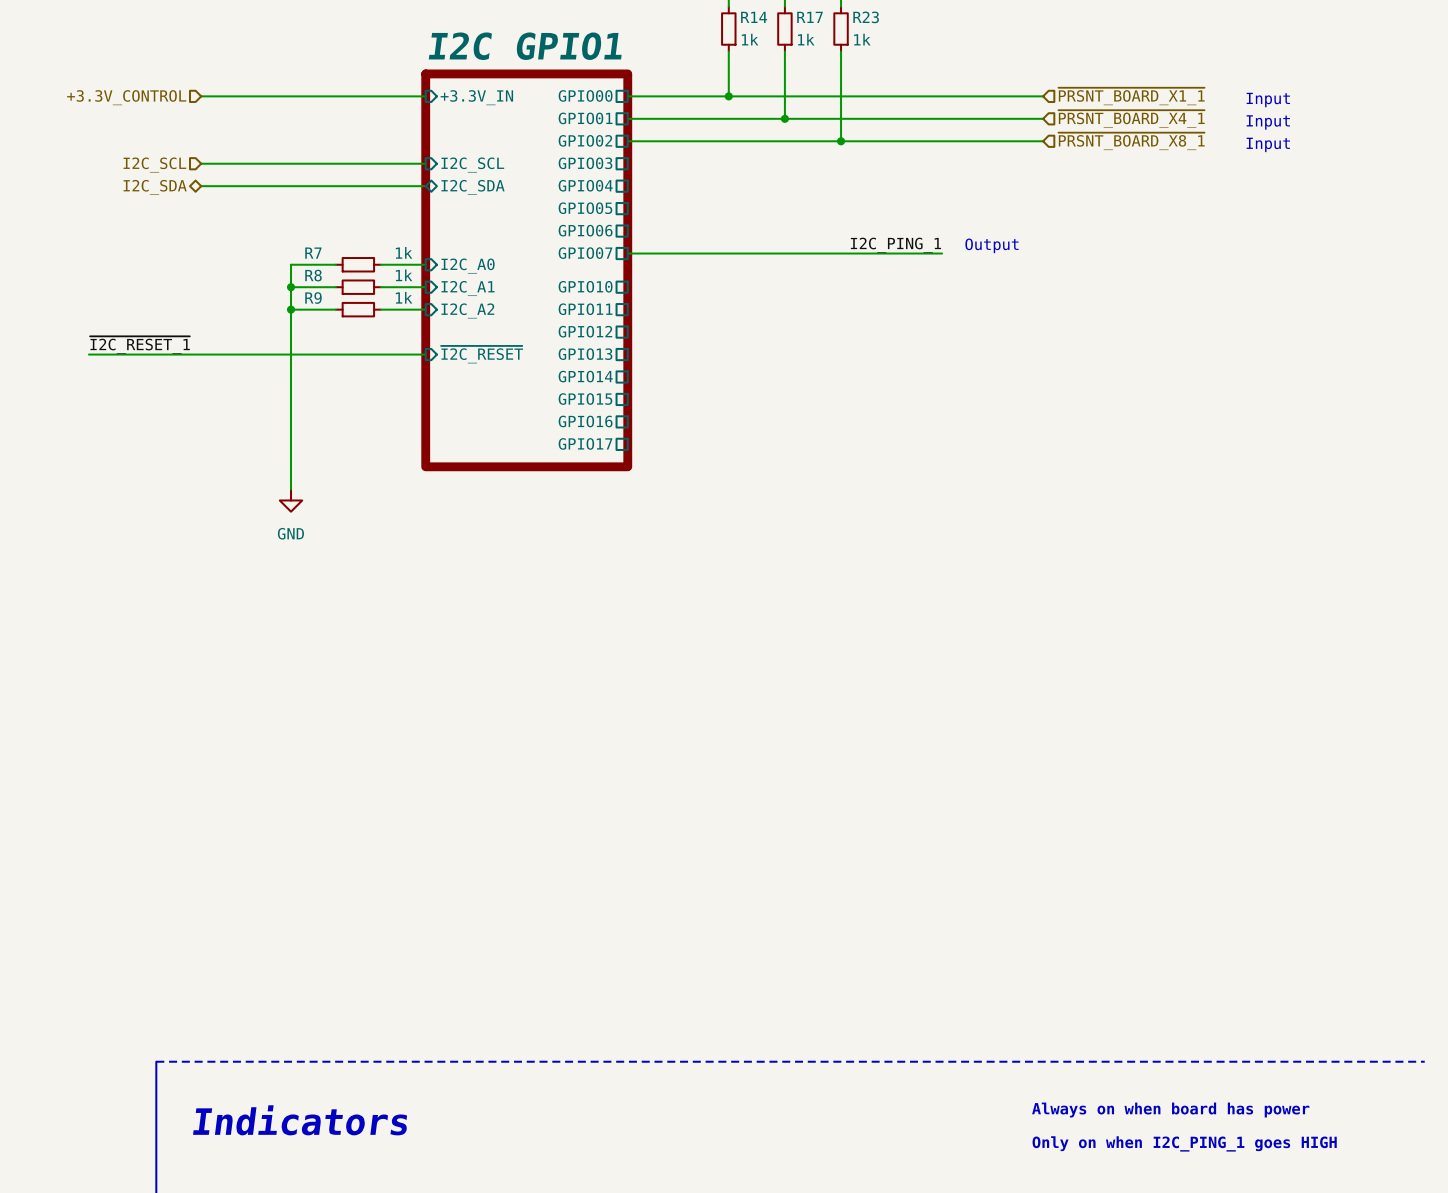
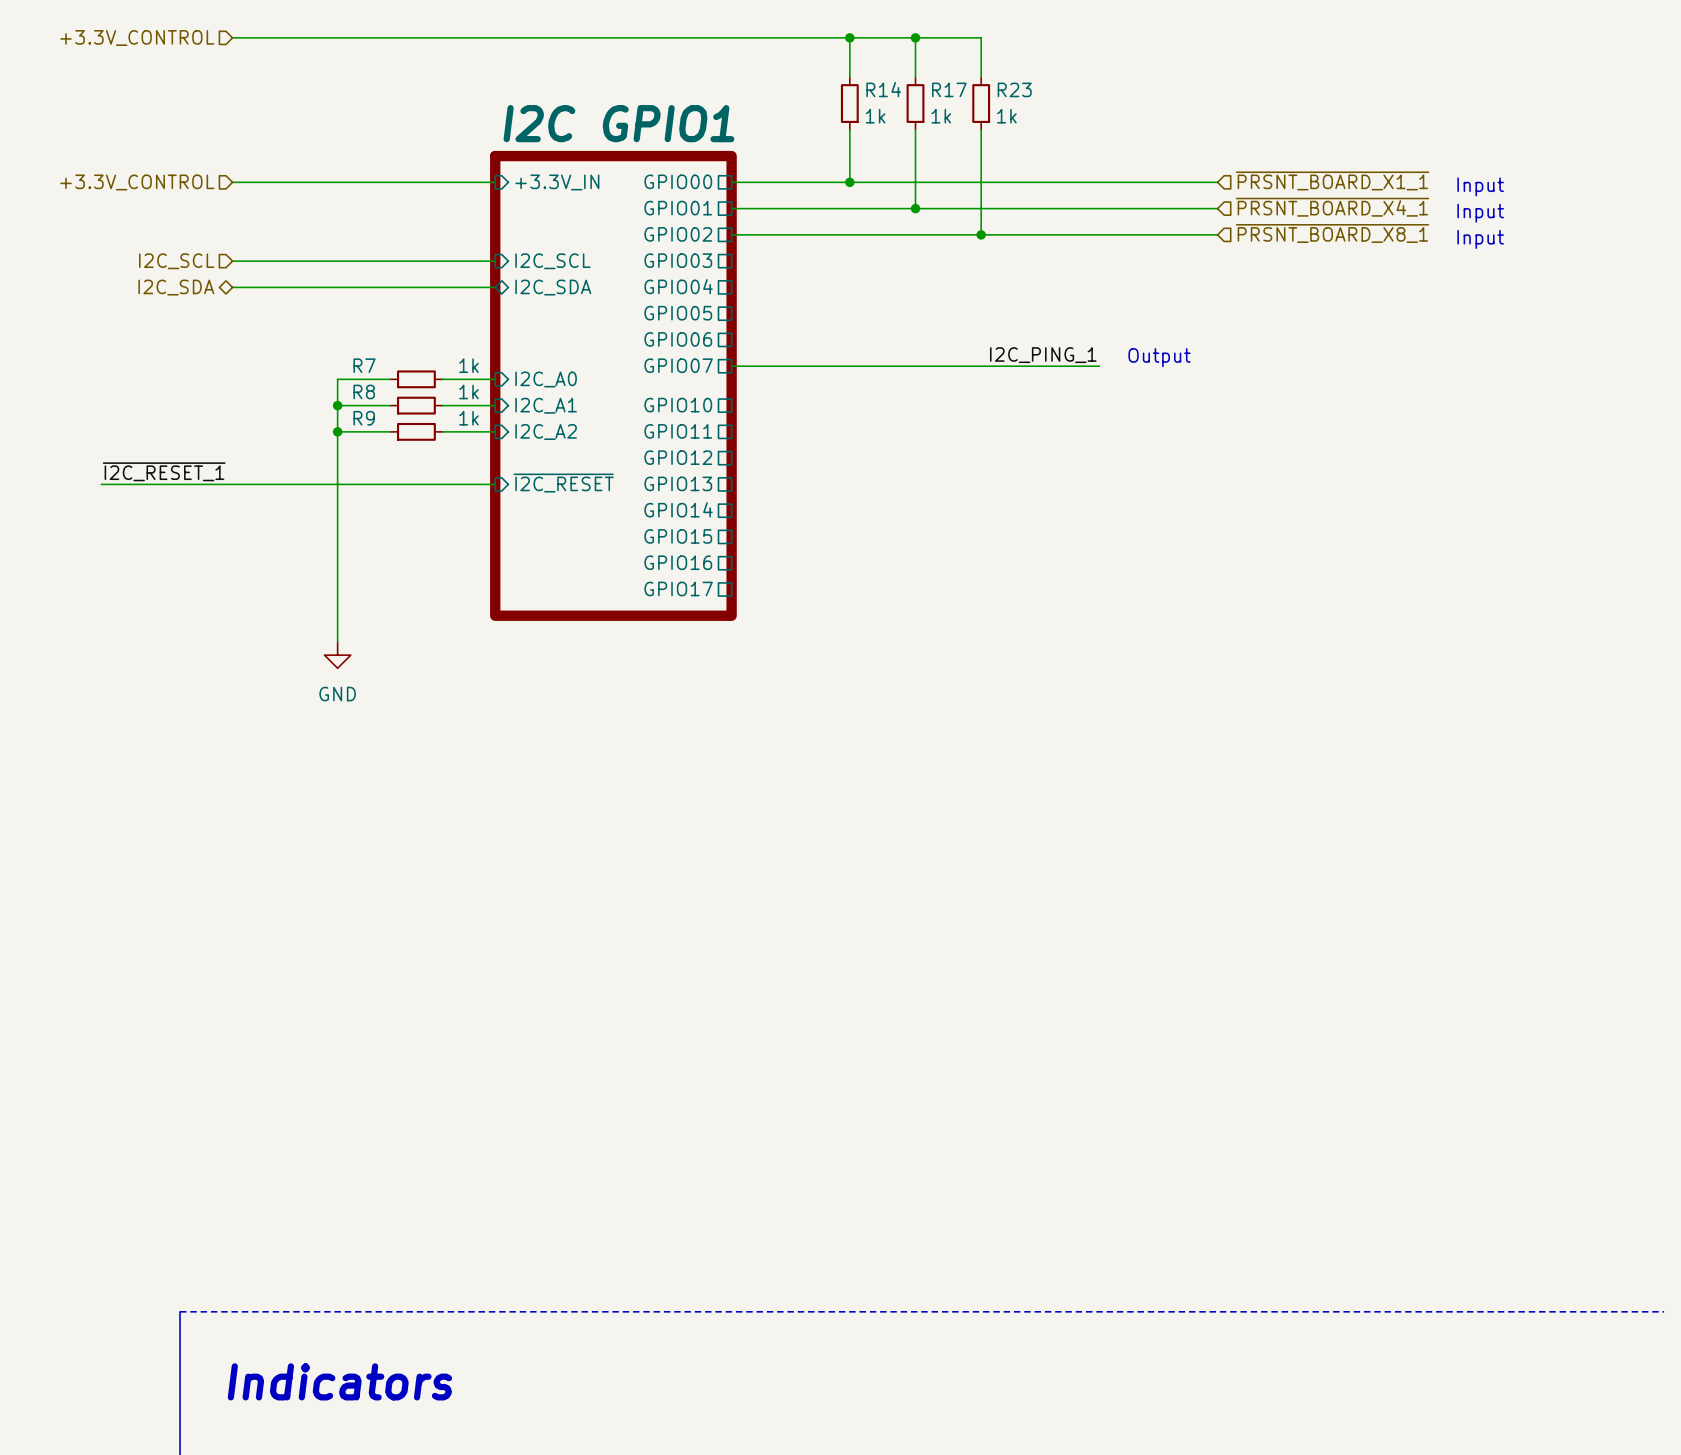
text: Always on when board has power (1170, 1110) -> none
text: Only on when I2C_PING_1 goes HIGH (1184, 1143) -> none

